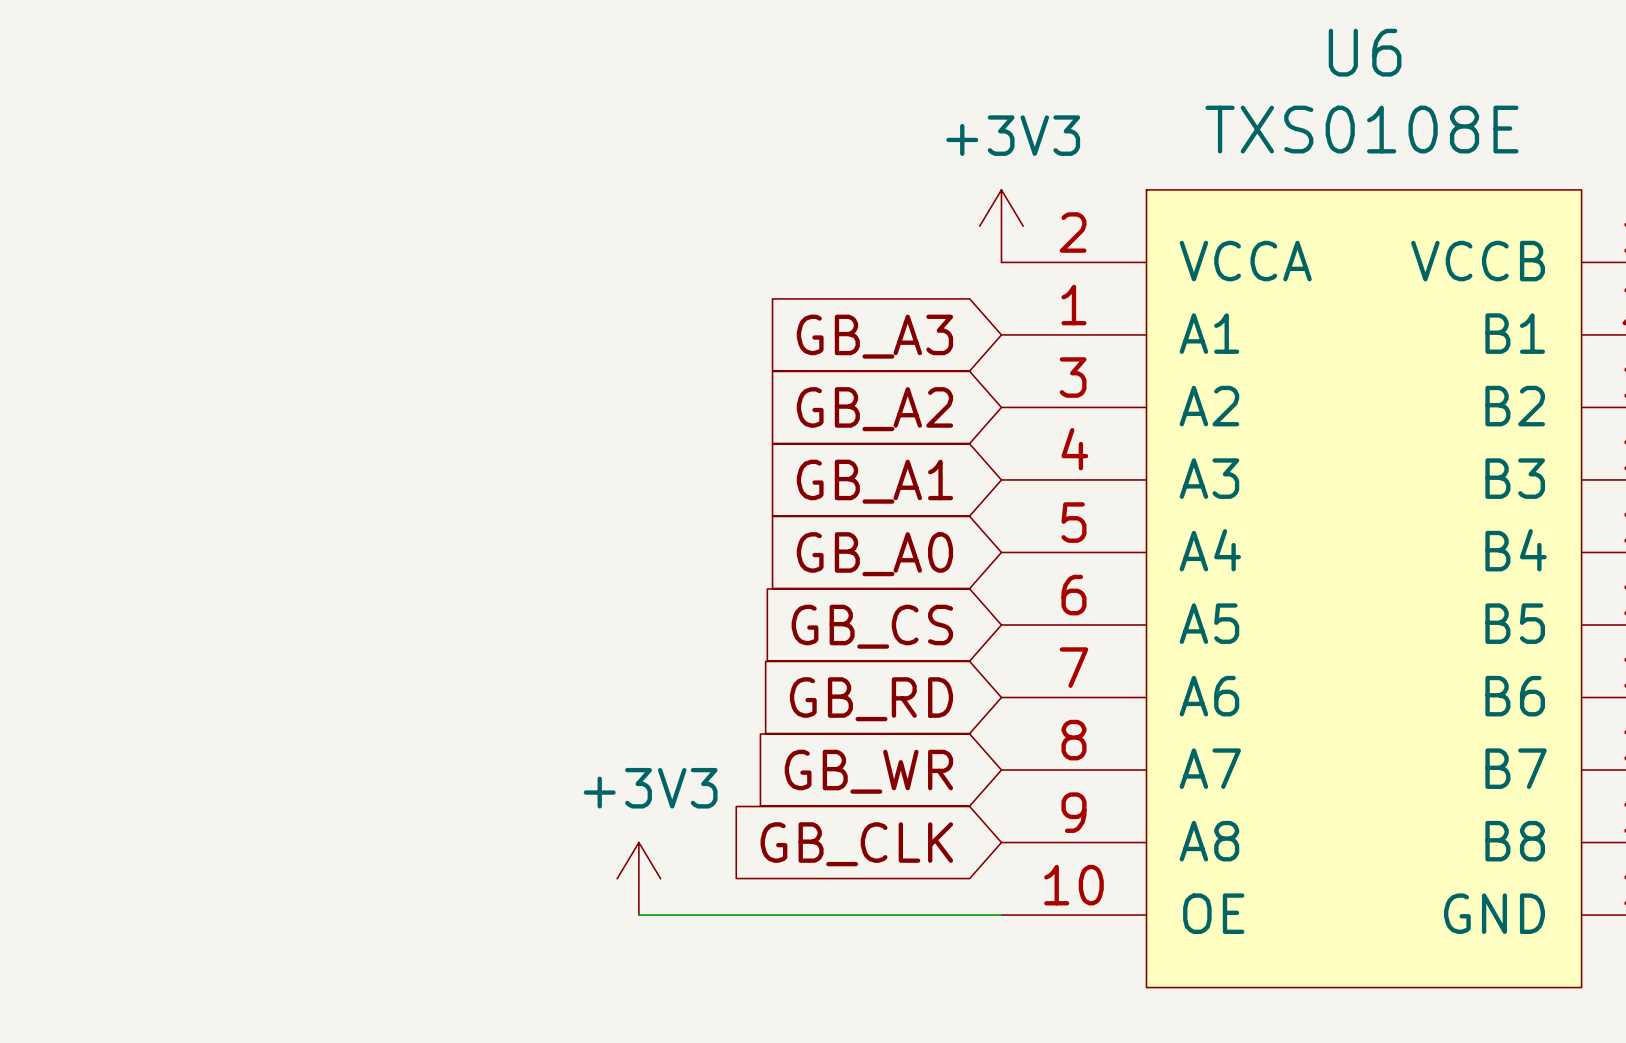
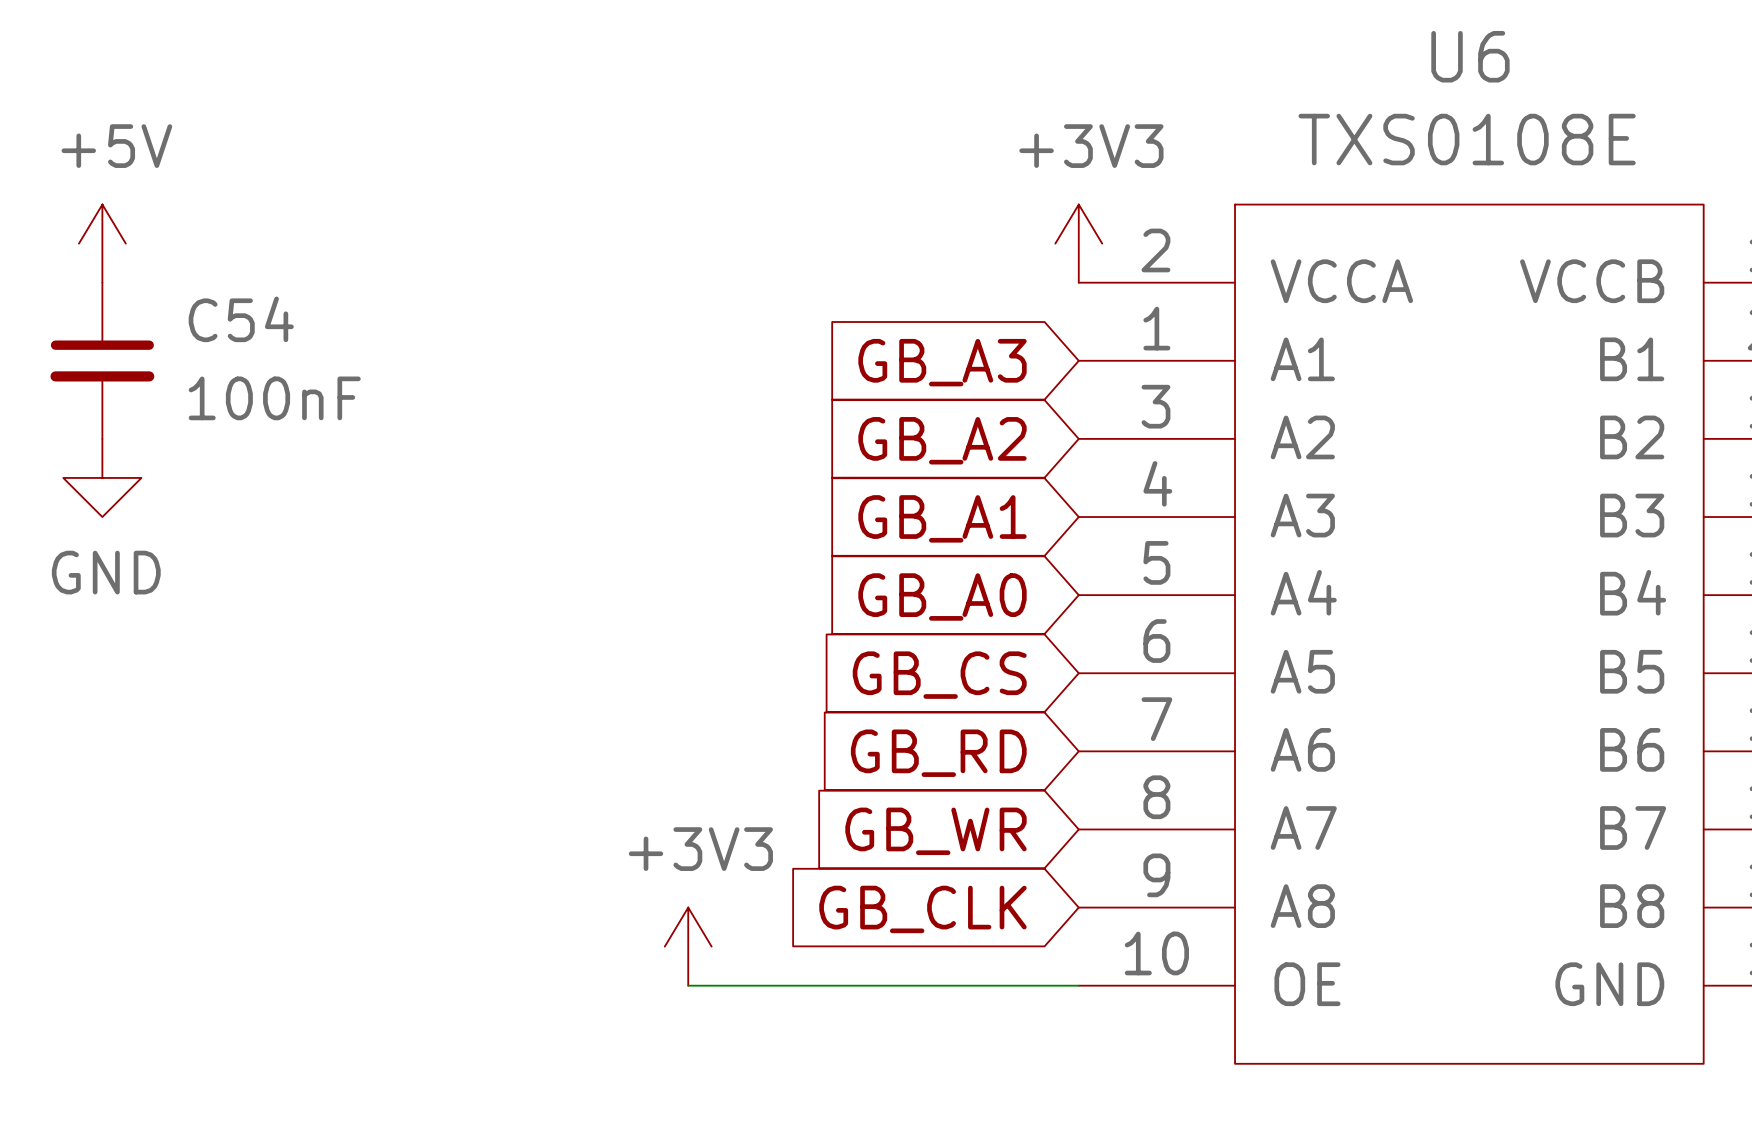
power symbol: none -> +5V (102, 243)
C54: none -> 100nF (102, 360)
power symbol: none -> GND (102, 477)

